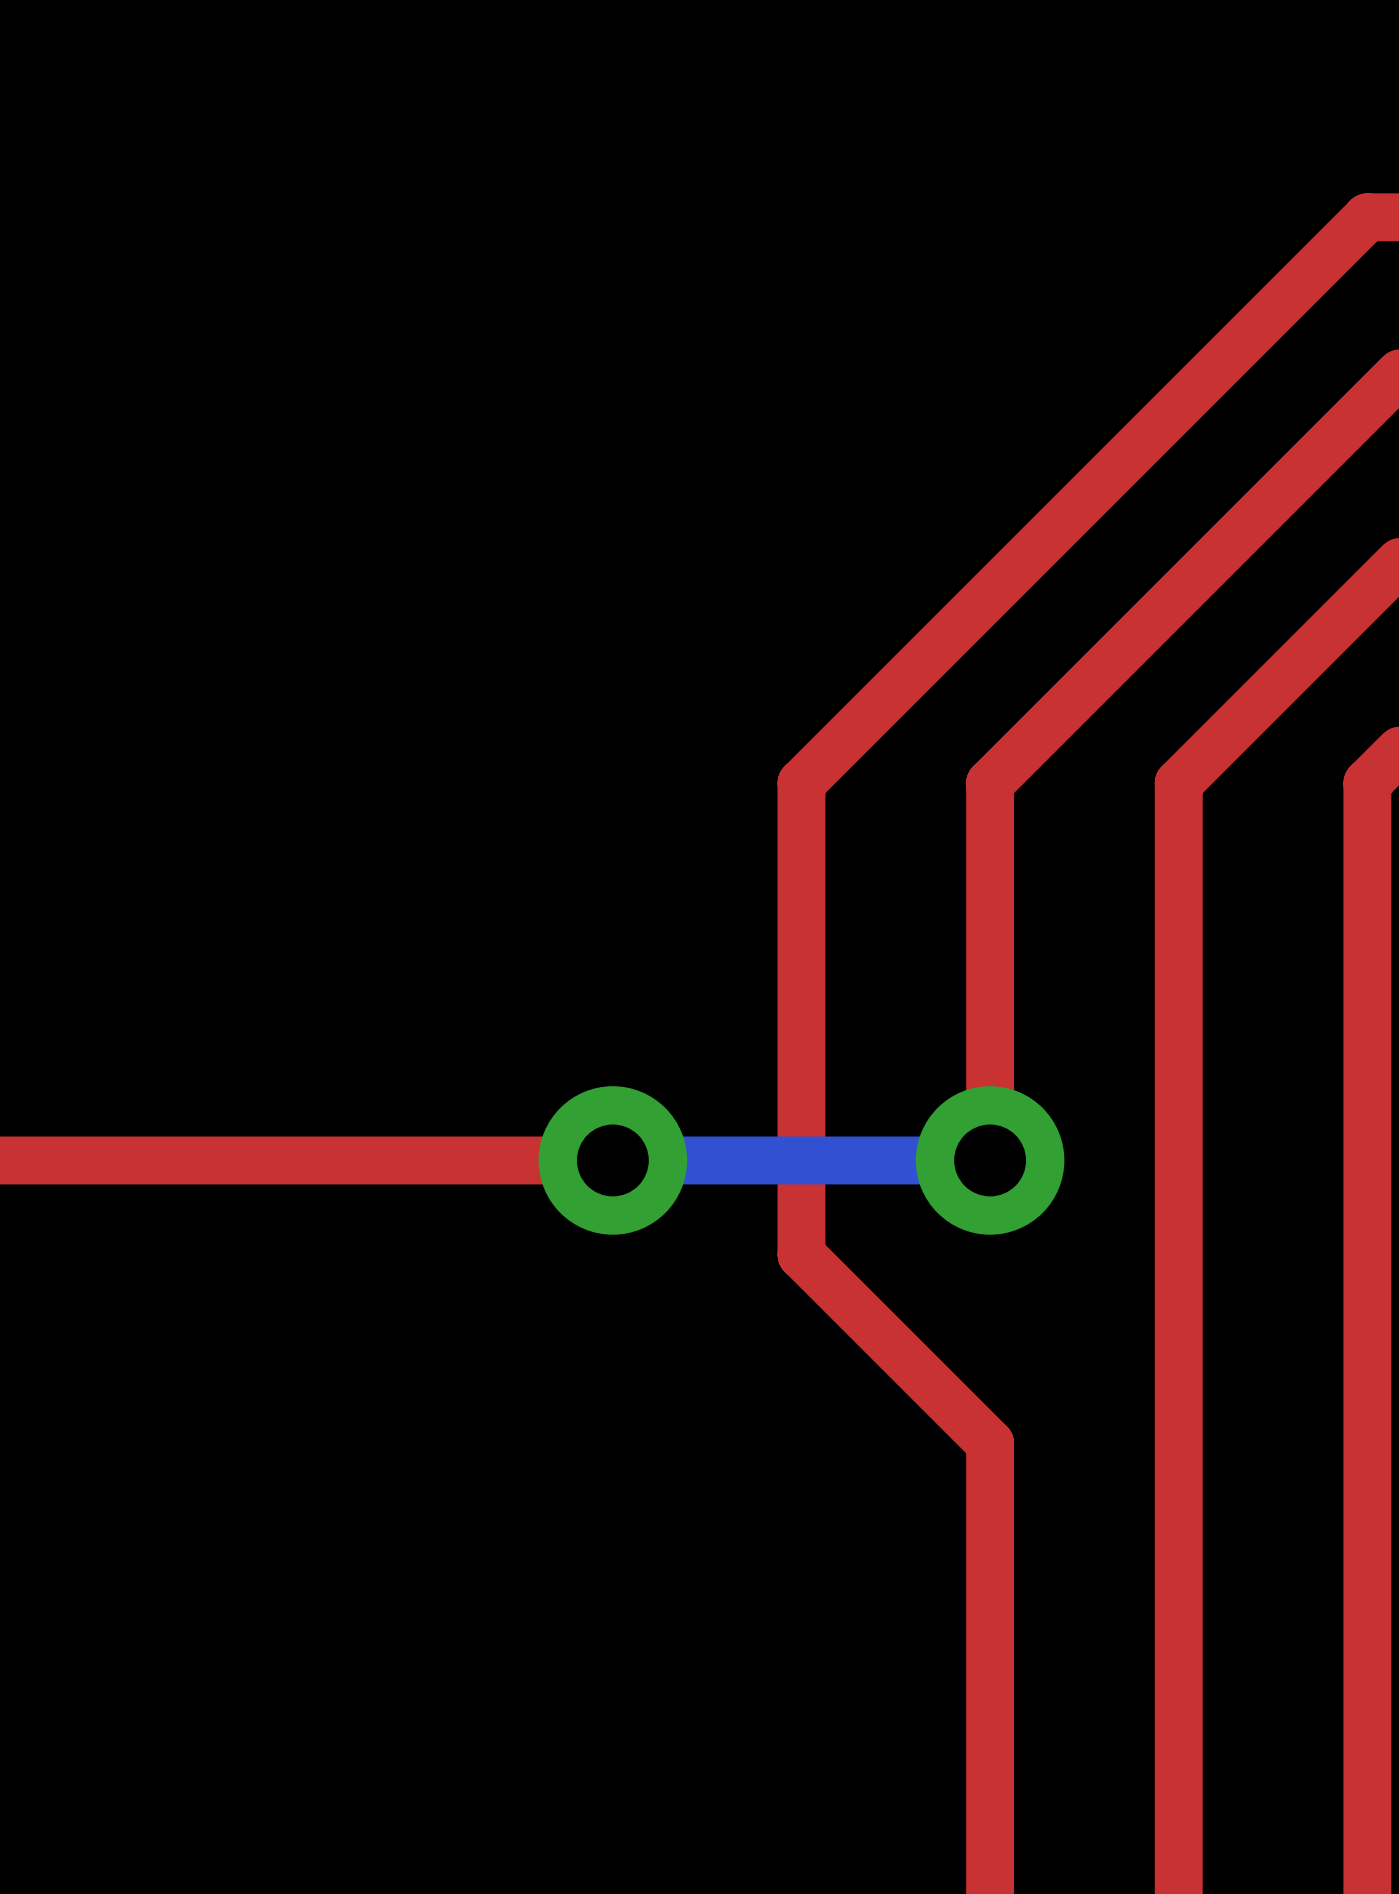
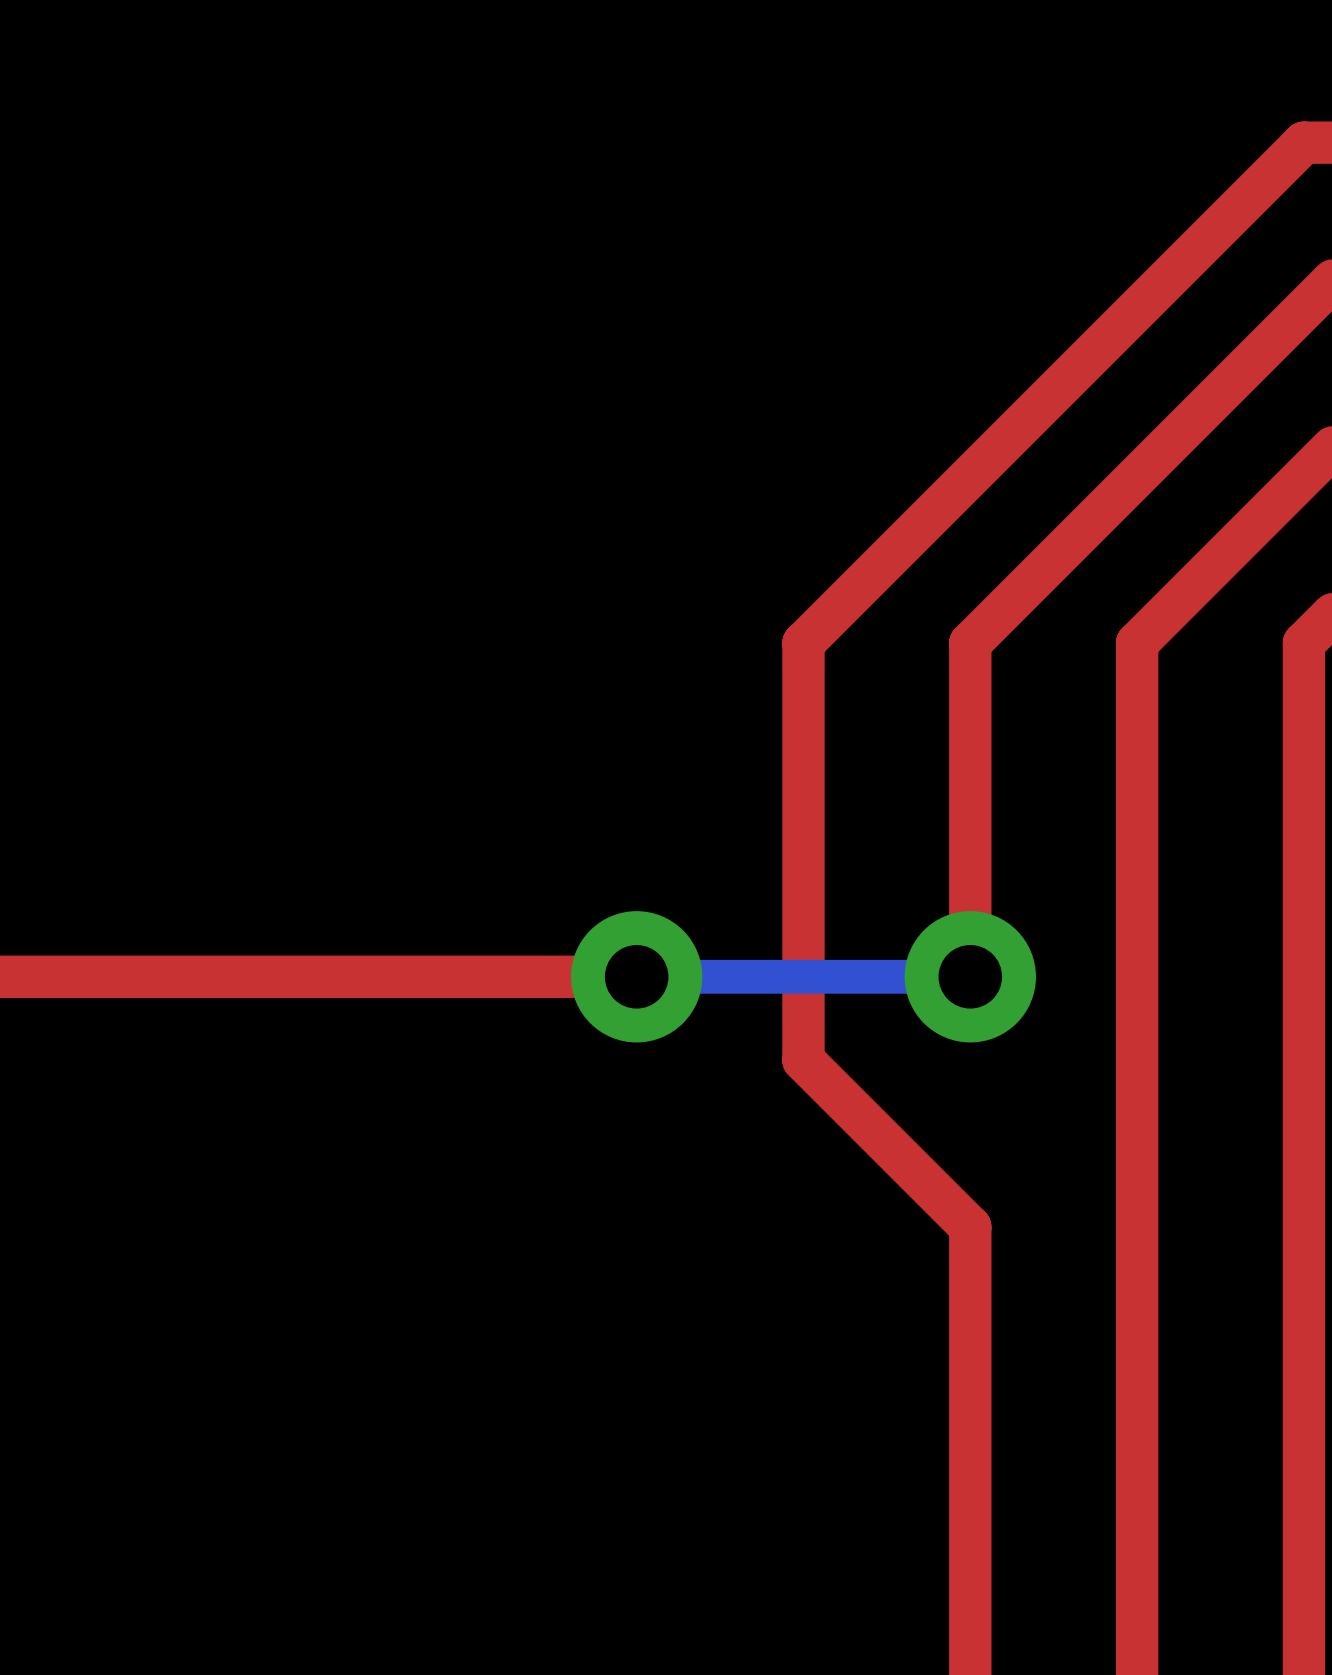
bottom track width: thick (990, 1160) (612, 1160) -> thin (970, 976) (636, 976)

